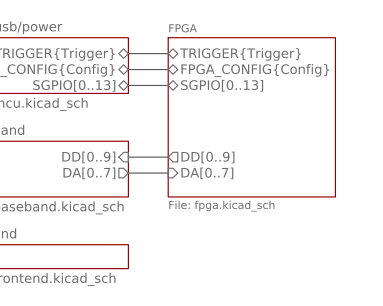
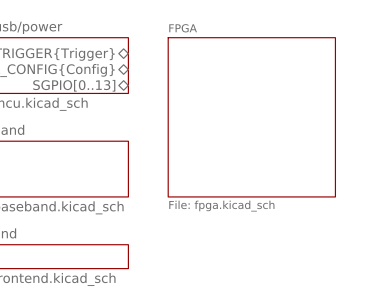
bus: (128, 53) (168, 53) -> none
sheet pin: TRIGGER{Trigger} (240, 54) -> none
bus: (128, 69) (168, 69) -> none
sheet pin: FPGA_CONFIG{Config} (255, 70) -> none
bus: (128, 85) (168, 85) -> none
sheet pin: SGPIO[0..13] (222, 85) -> none
sheet pin: DD[0..9] (88, 157) -> none
bus: (128, 157) (168, 157) -> none
sheet pin: DD[0..9] (207, 157) -> none
sheet pin: DA[0..7] (89, 173) -> none
bus: (128, 173) (168, 173) -> none
sheet pin: DA[0..7] (207, 173) -> none

